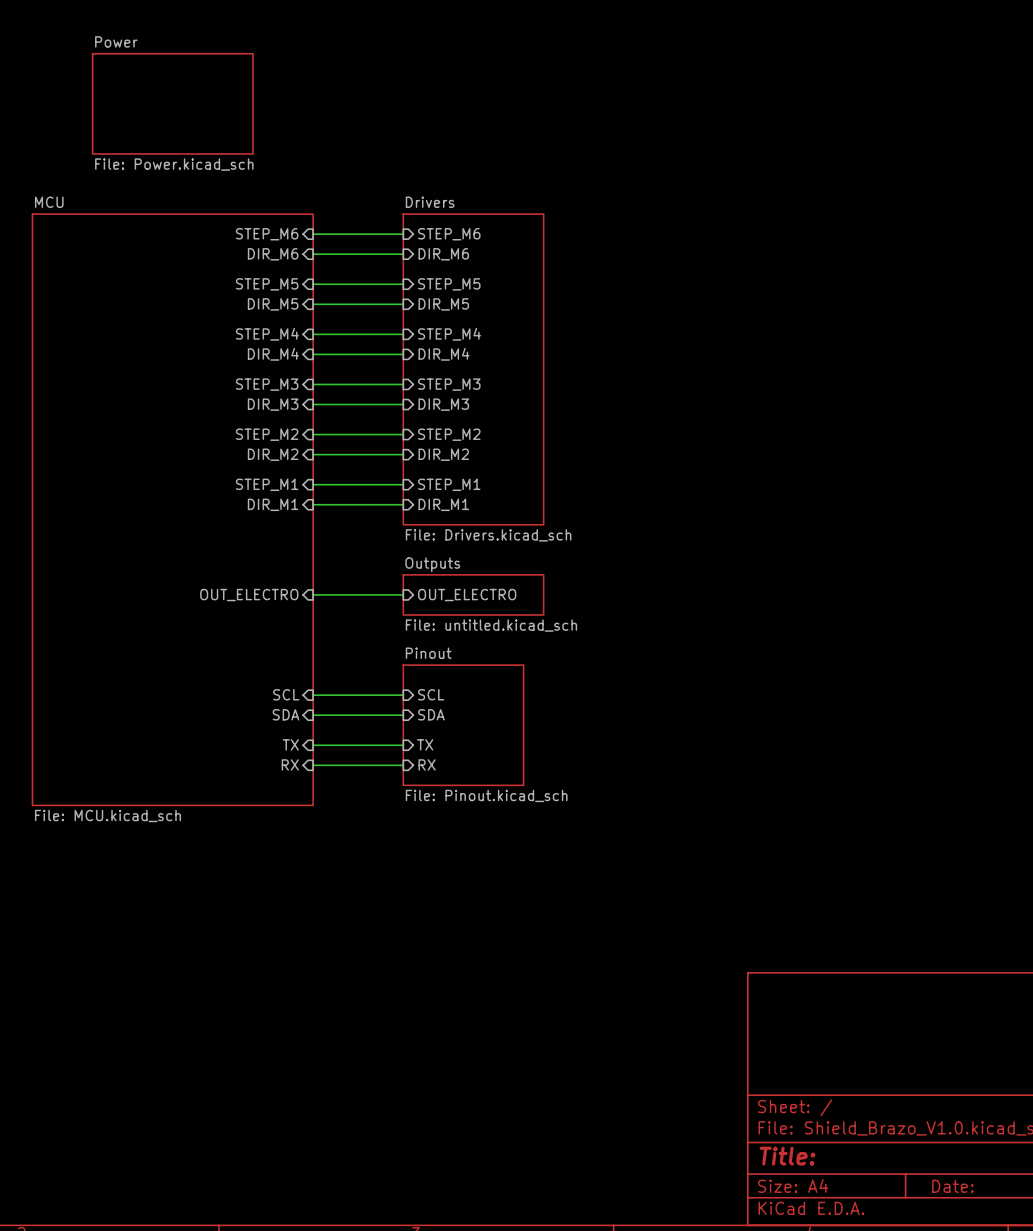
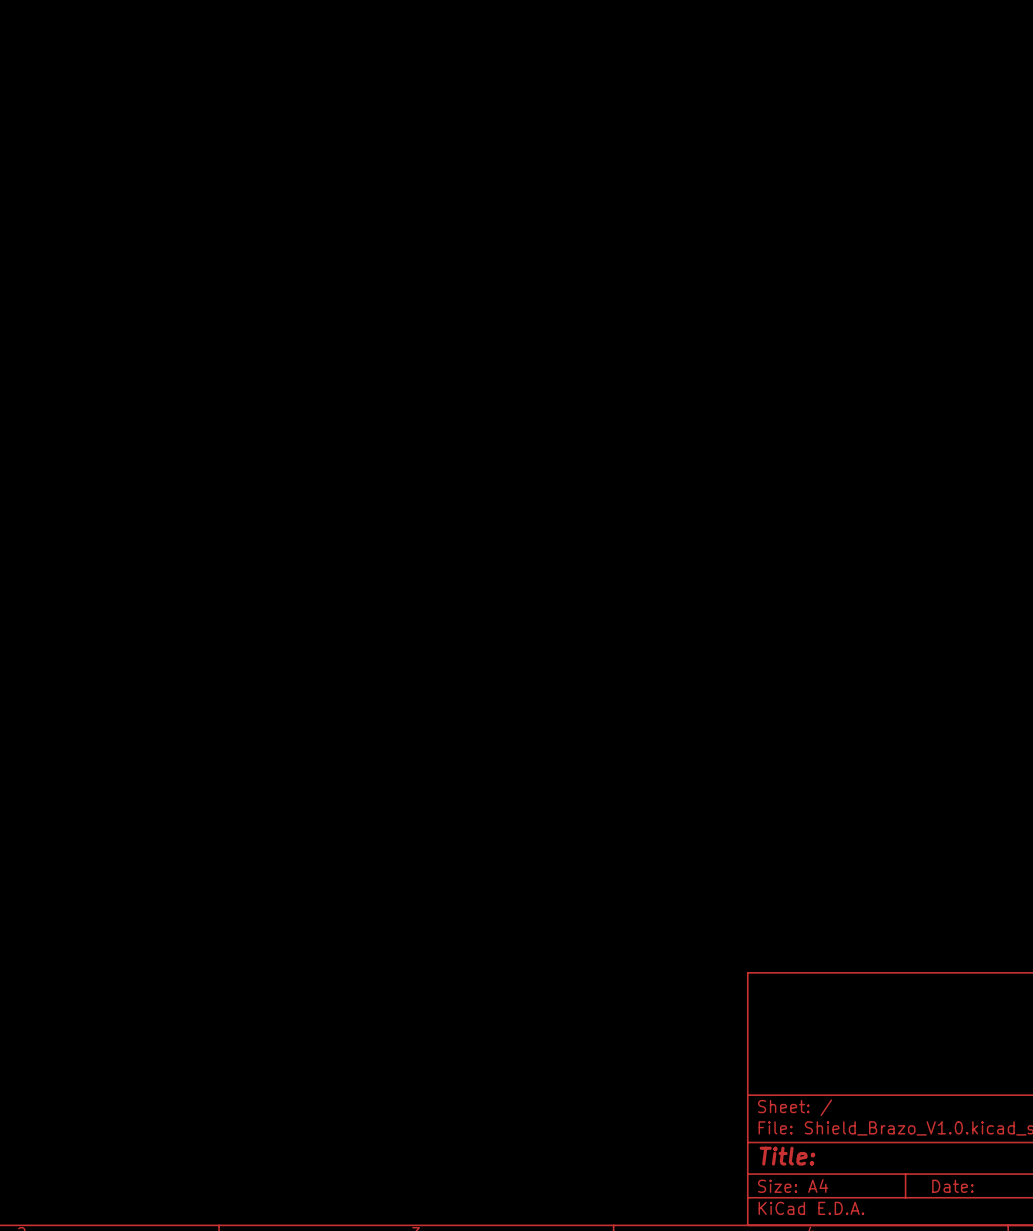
sheet Power: File: Power.kicad_sch (172, 103) -> none
sheet pin: STEP_M6 (267, 234) -> none
wire: (313, 234) (403, 234) -> none
sheet pin: STEP_M6 (449, 234) -> none
sheet pin: DIR_M6 (273, 254) -> none
wire: (313, 254) (403, 254) -> none
sheet pin: DIR_M6 (443, 254) -> none
sheet pin: STEP_M5 (267, 284) -> none
wire: (313, 284) (403, 284) -> none
sheet pin: STEP_M5 (449, 284) -> none
sheet pin: DIR_M5 (273, 304) -> none
wire: (313, 304) (403, 304) -> none
sheet pin: DIR_M5 (443, 304) -> none
sheet pin: STEP_M4 (267, 334) -> none
wire: (313, 334) (403, 334) -> none
sheet pin: STEP_M4 (449, 334) -> none
sheet pin: DIR_M4 (273, 354) -> none
wire: (313, 354) (403, 354) -> none
sheet pin: DIR_M4 (444, 354) -> none
sheet Drivers: File: Drivers.kicad_sch (473, 369) -> none
sheet pin: STEP_M3 (267, 384) -> none
wire: (313, 384) (403, 384) -> none
sheet pin: STEP_M3 (449, 384) -> none
sheet pin: DIR_M3 (273, 404) -> none
wire: (313, 404) (403, 404) -> none
sheet pin: DIR_M3 (443, 404) -> none
sheet pin: STEP_M2 (267, 434) -> none
wire: (313, 434) (403, 434) -> none
sheet pin: STEP_M2 (449, 434) -> none
sheet pin: DIR_M2 (273, 454) -> none
wire: (313, 454) (403, 454) -> none
sheet pin: DIR_M2 (443, 454) -> none
sheet pin: STEP_M1 (267, 484) -> none
wire: (313, 484) (403, 484) -> none
sheet pin: STEP_M1 (449, 484) -> none
sheet pin: DIR_M1 (273, 504) -> none
wire: (313, 504) (403, 504) -> none
sheet pin: DIR_M1 (443, 504) -> none
sheet MCU: File: MCU.kicad_sch (172, 509) -> none
wire: (313, 594) (403, 594) -> none
sheet Outputs: File: untitled.kicad_sch (473, 594) -> none
sheet pin: OUT_ELECTRO (249, 595) -> none
sheet pin: OUT_ELECTRO (467, 595) -> none
sheet pin: SCL (286, 694) -> none
sheet pin: SCL (431, 694) -> none
wire: (313, 695) (403, 695) -> none
sheet pin: SDA (285, 714) -> none
sheet pin: SDA (431, 714) -> none
wire: (313, 715) (403, 715) -> none
sheet Pinout: File: Pinout.kicad_sch (463, 725) -> none
sheet pin: TX (290, 744) -> none
sheet pin: TX (425, 744) -> none
wire: (313, 745) (403, 745) -> none
sheet pin: RX (290, 764) -> none
sheet pin: RX (427, 764) -> none
wire: (313, 765) (403, 765) -> none

